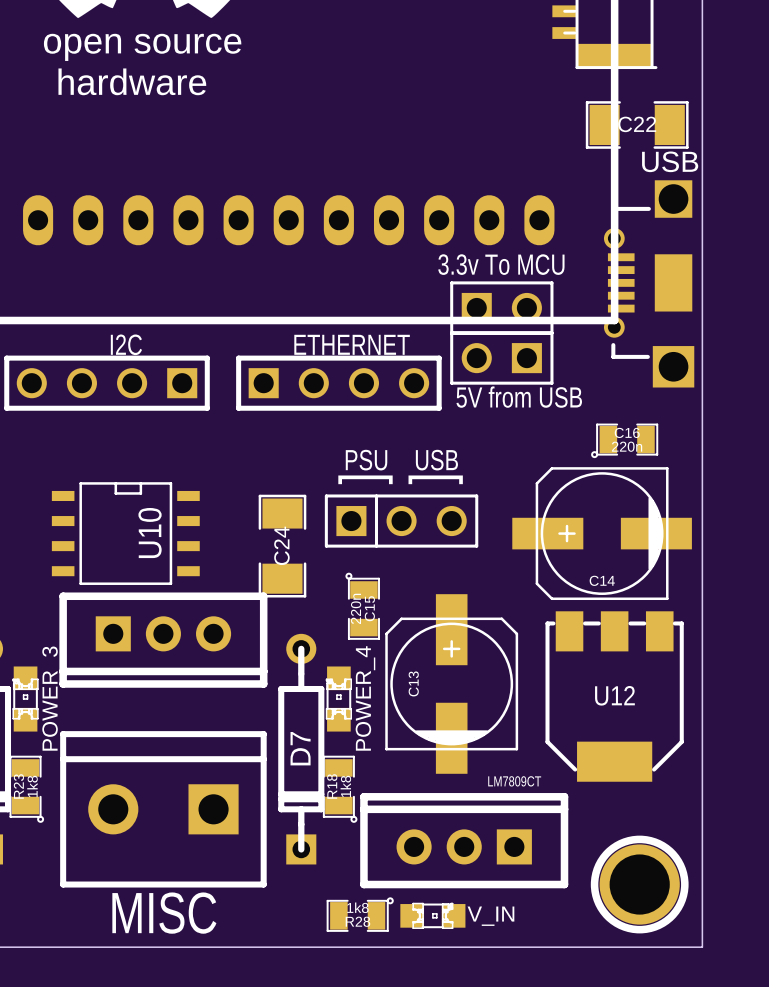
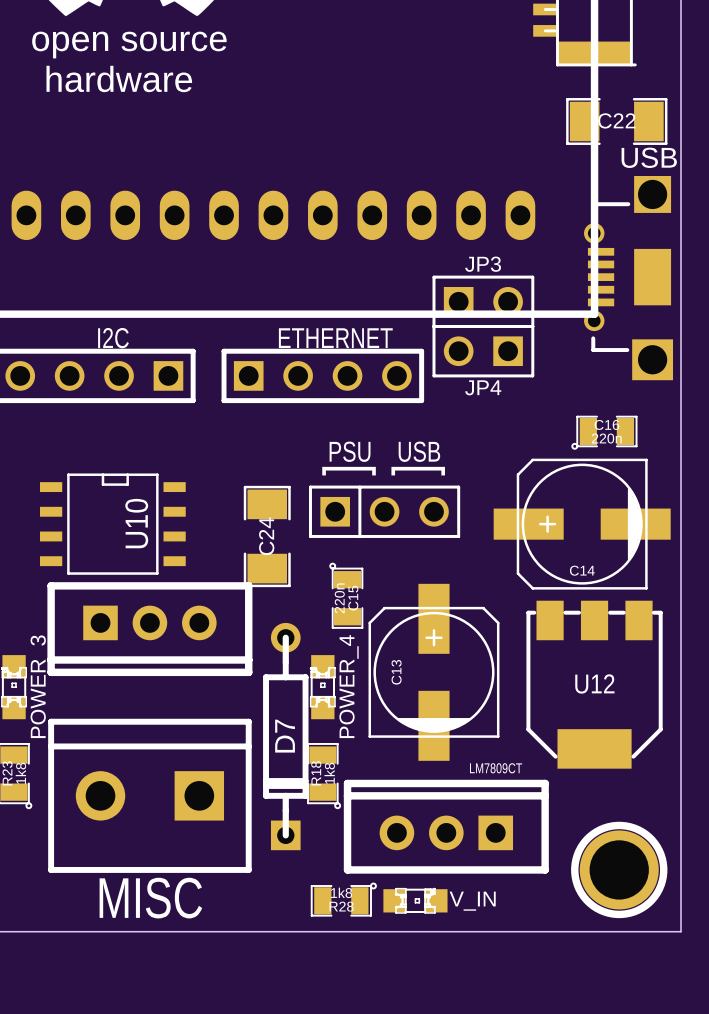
text: 3.3v To MCU (501, 264) -> none
JP3 name: none -> JP3 (483, 264)
JP4 name: none -> JP4 (483, 387)
text: 5V from USB (519, 397) -> none

